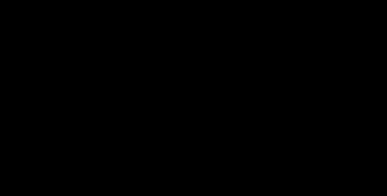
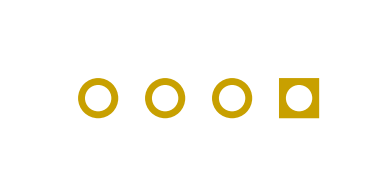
part: none -> (198, 98)

